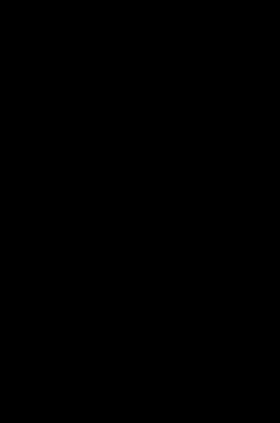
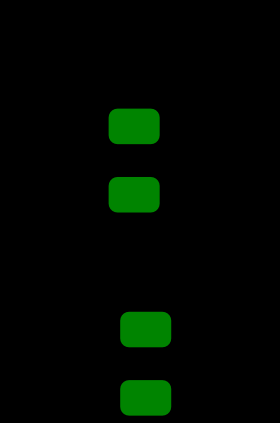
part: none -> (134, 160)
part: none -> (145, 363)

